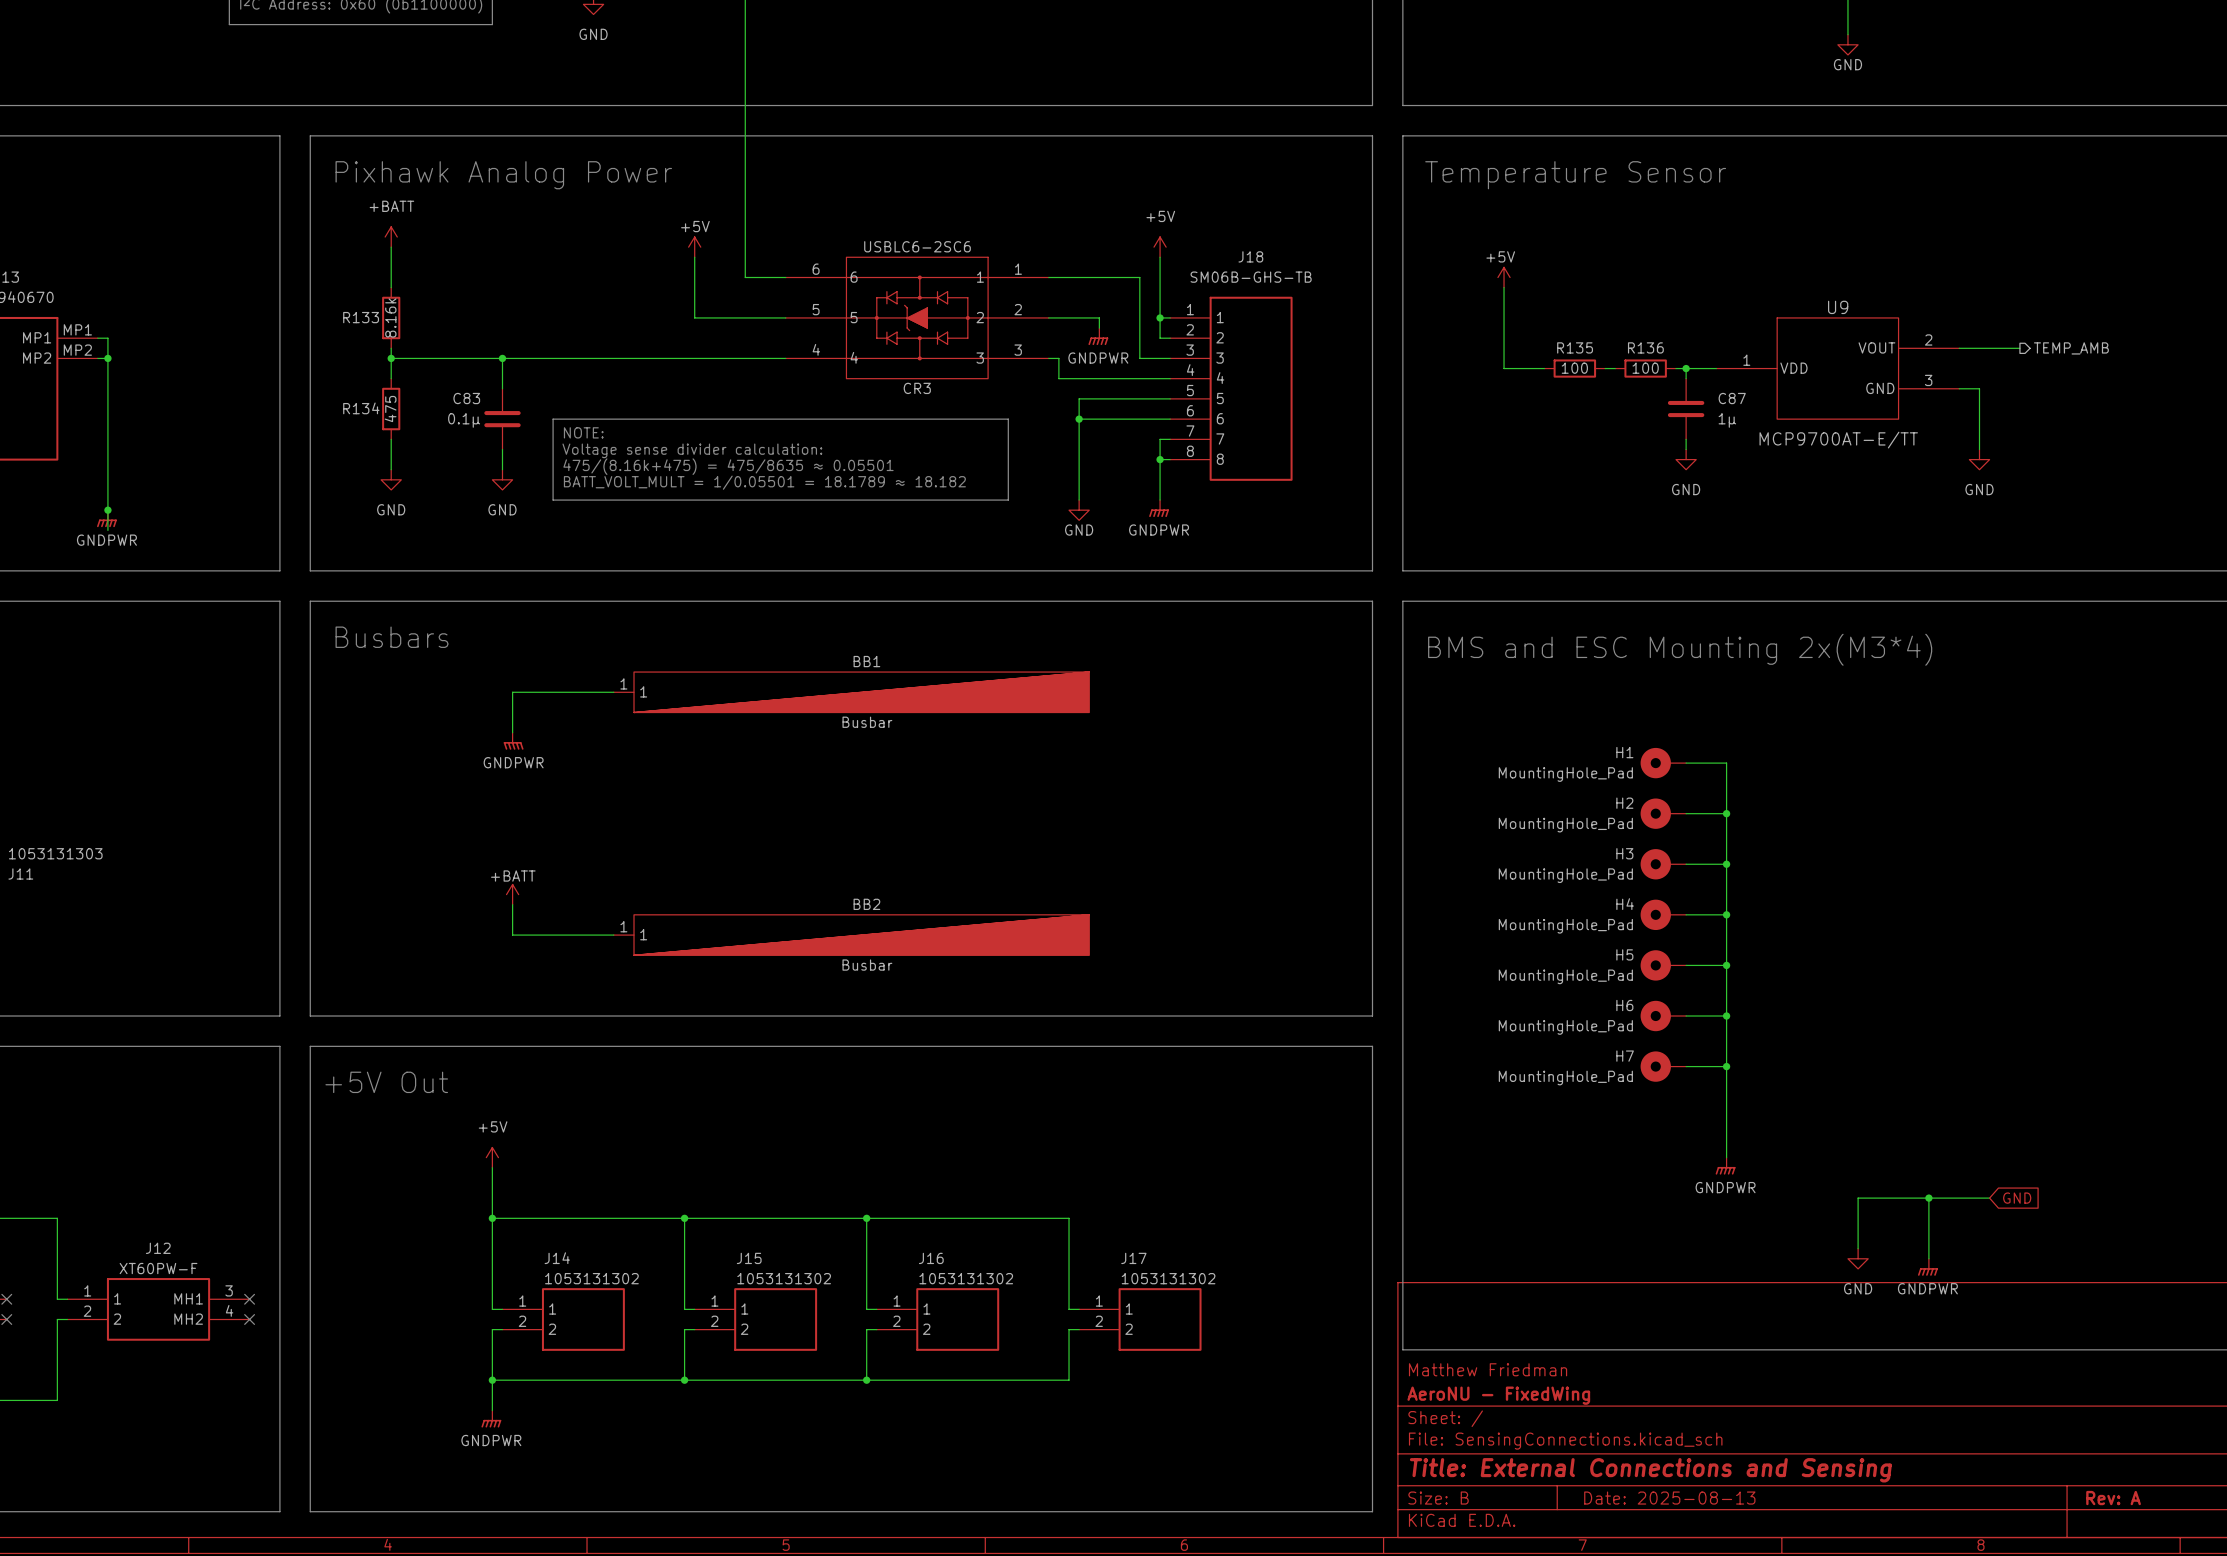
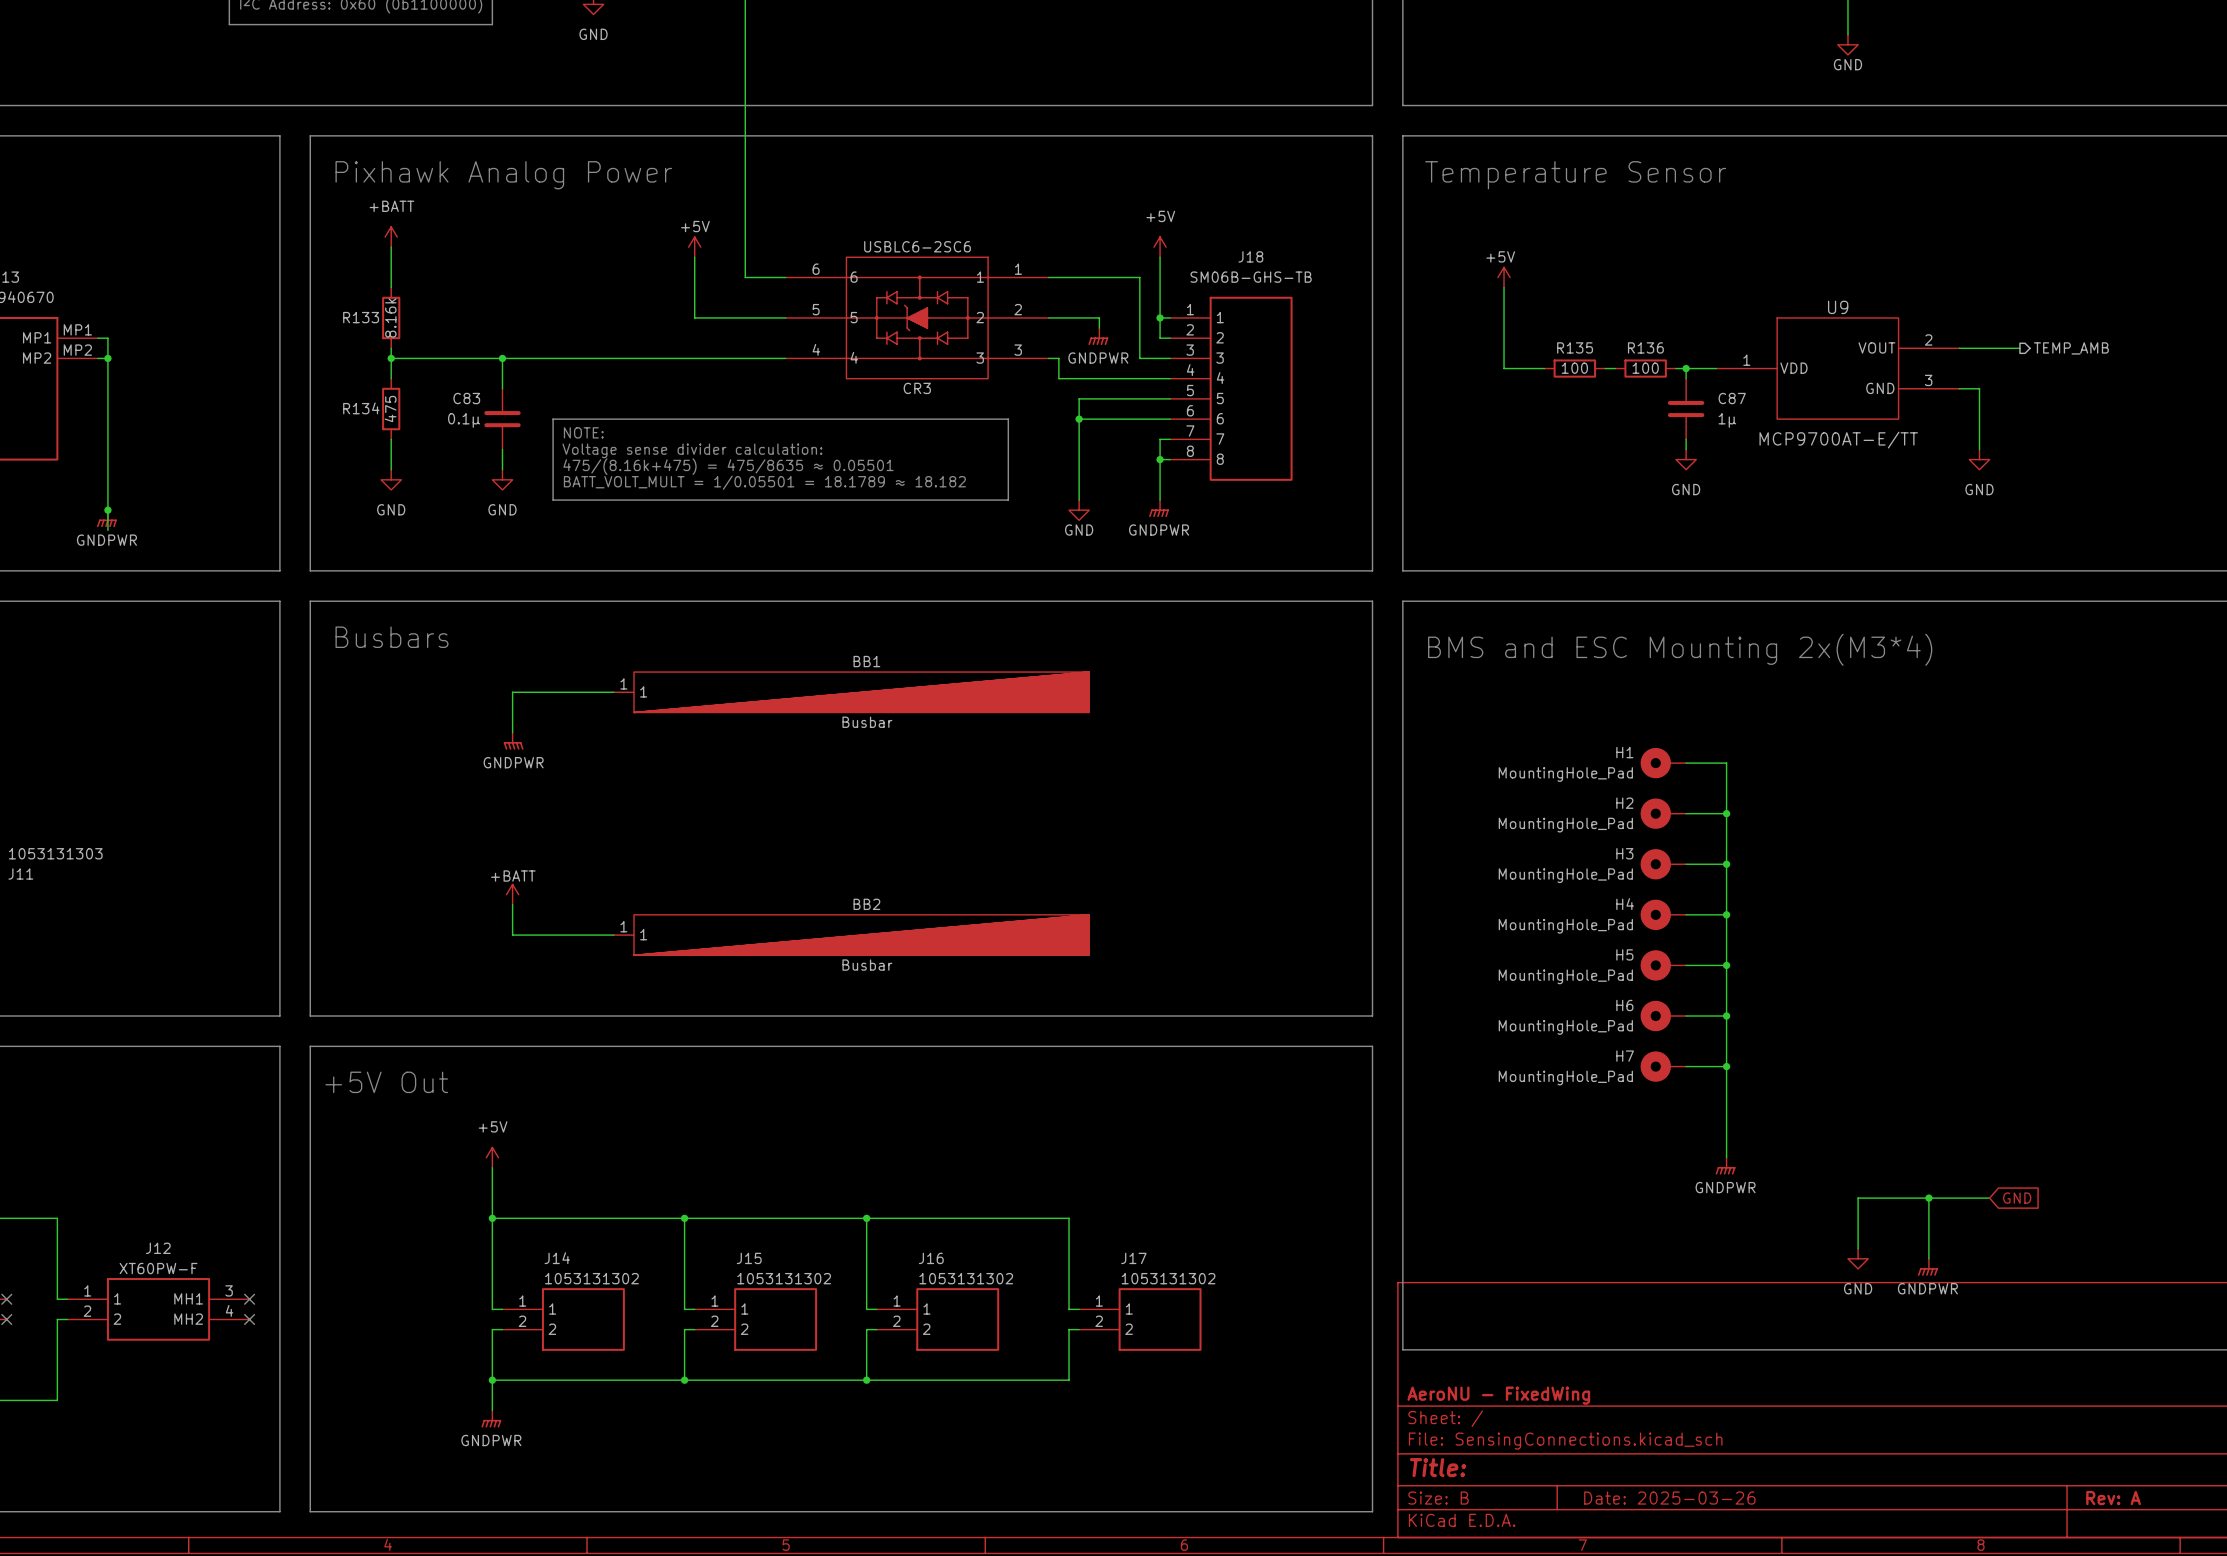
title block: Matthew Friedman (1488, 1369) -> none
title block: Title: External Connections and Sensing (1650, 1470) -> Title: (1437, 1467)
title block: Date: 2025-08-13 (1669, 1498) -> Date: 2025-03-26 (1669, 1498)

